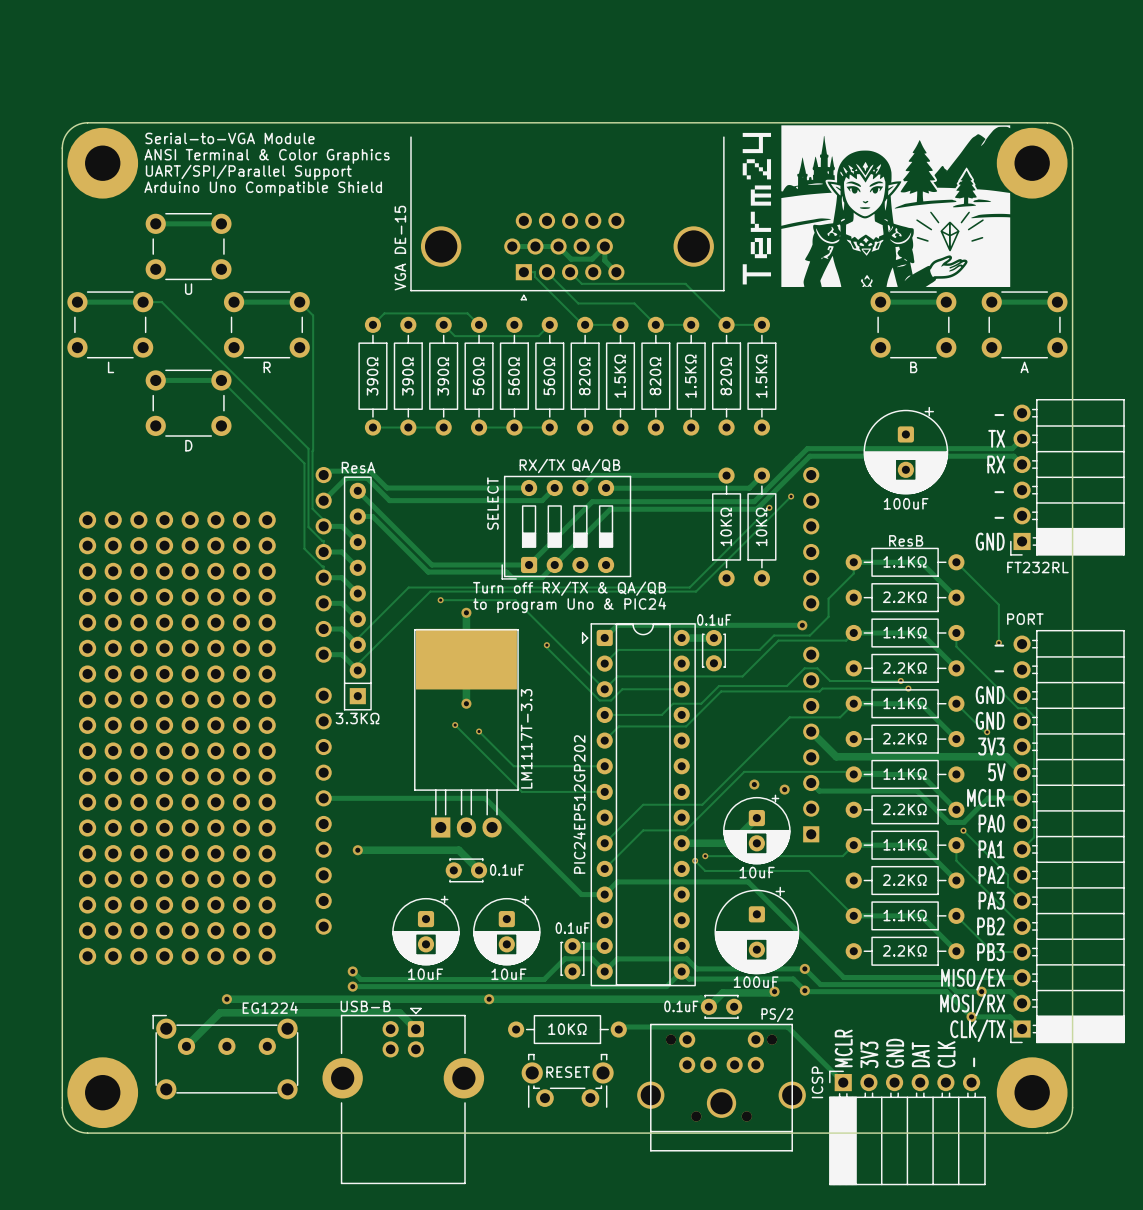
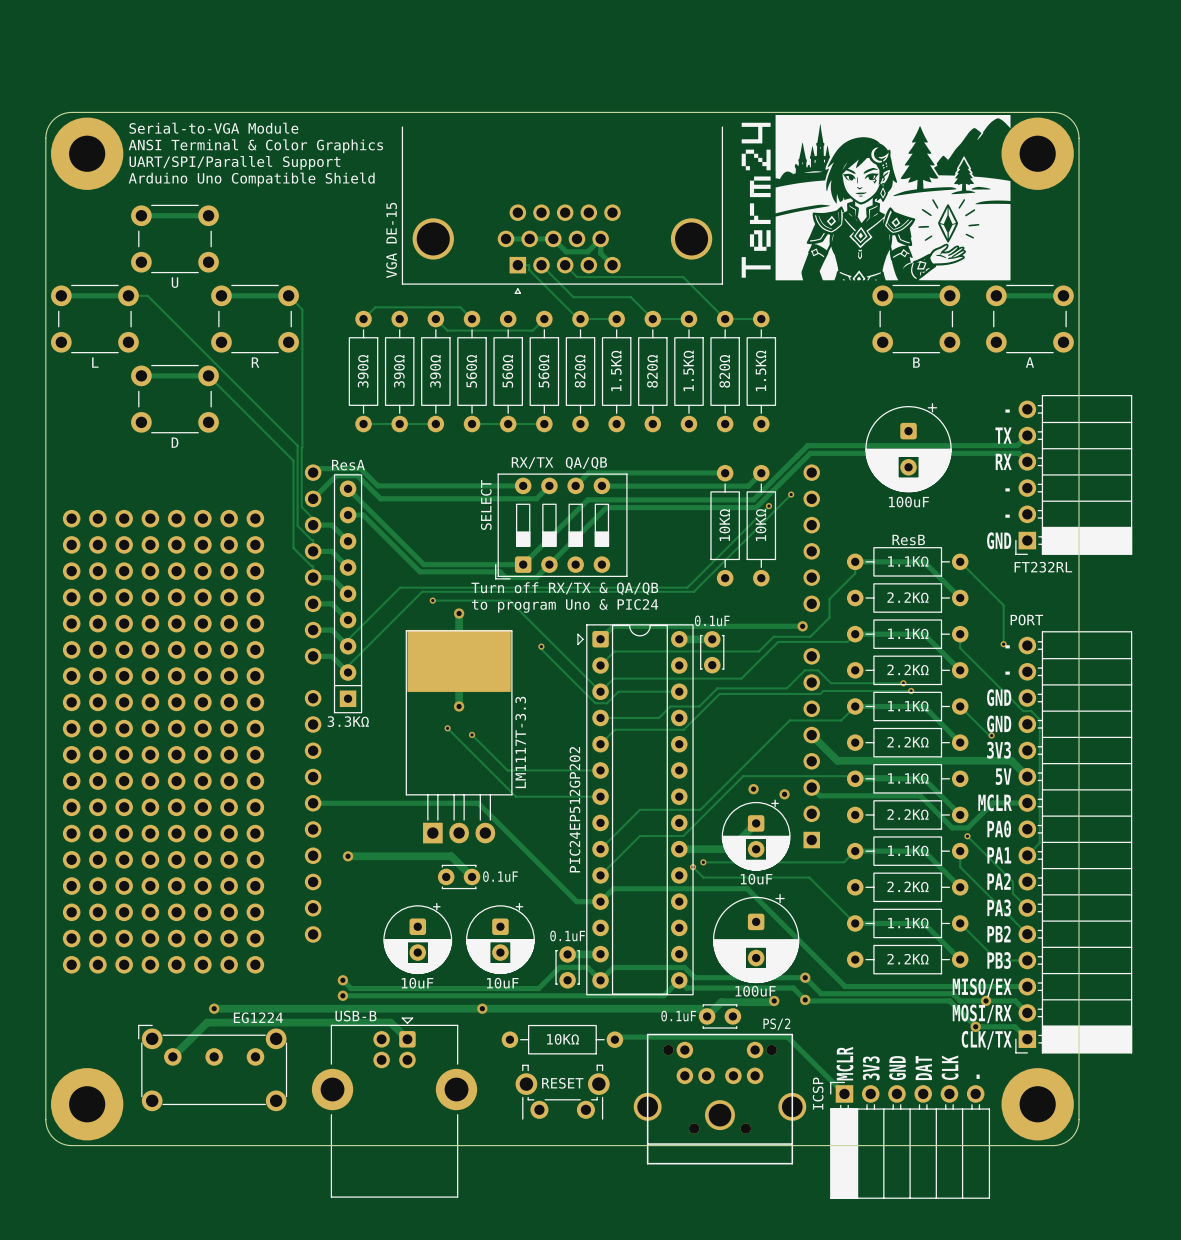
drawing shape: [781, 125, 1011, 287] -> [775, 115, 1011, 281]

